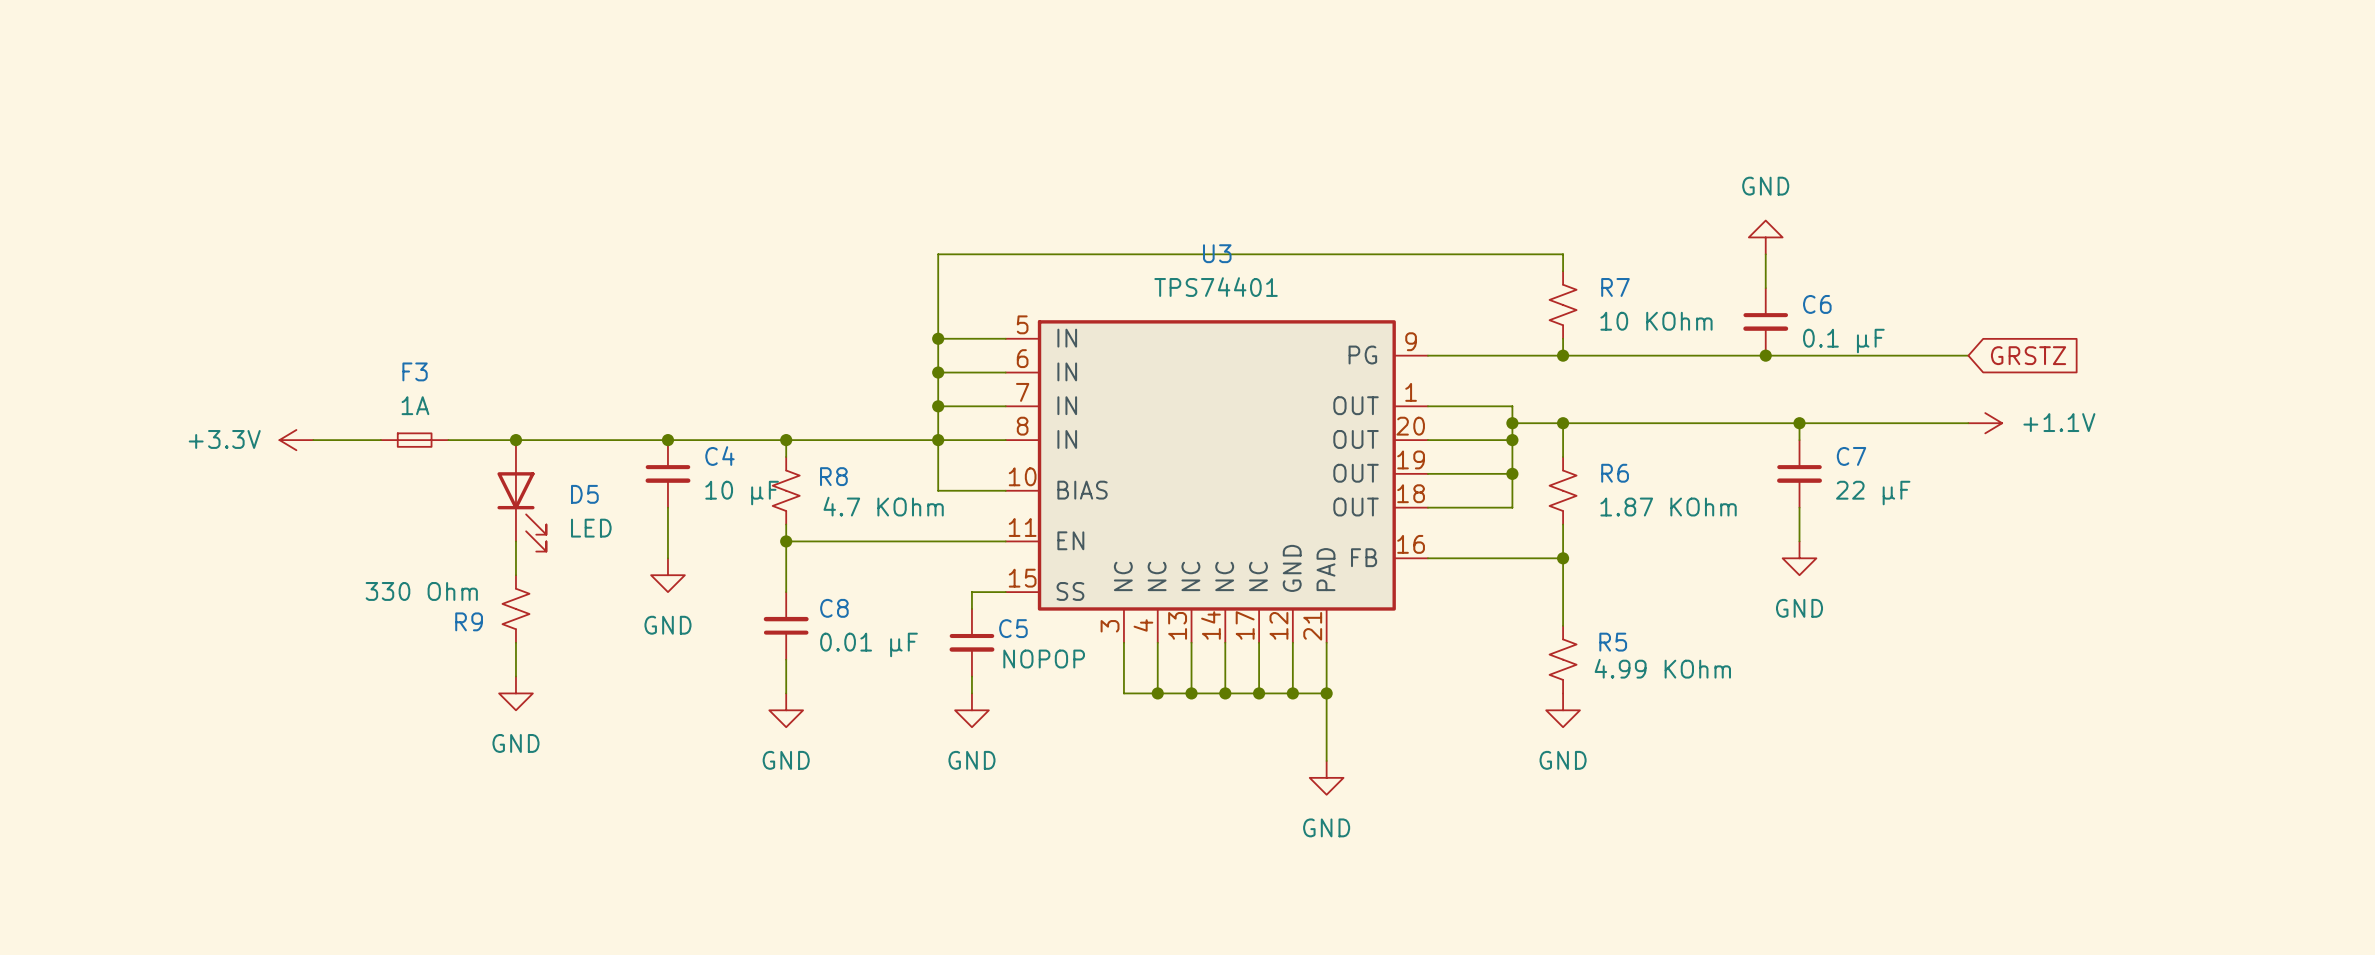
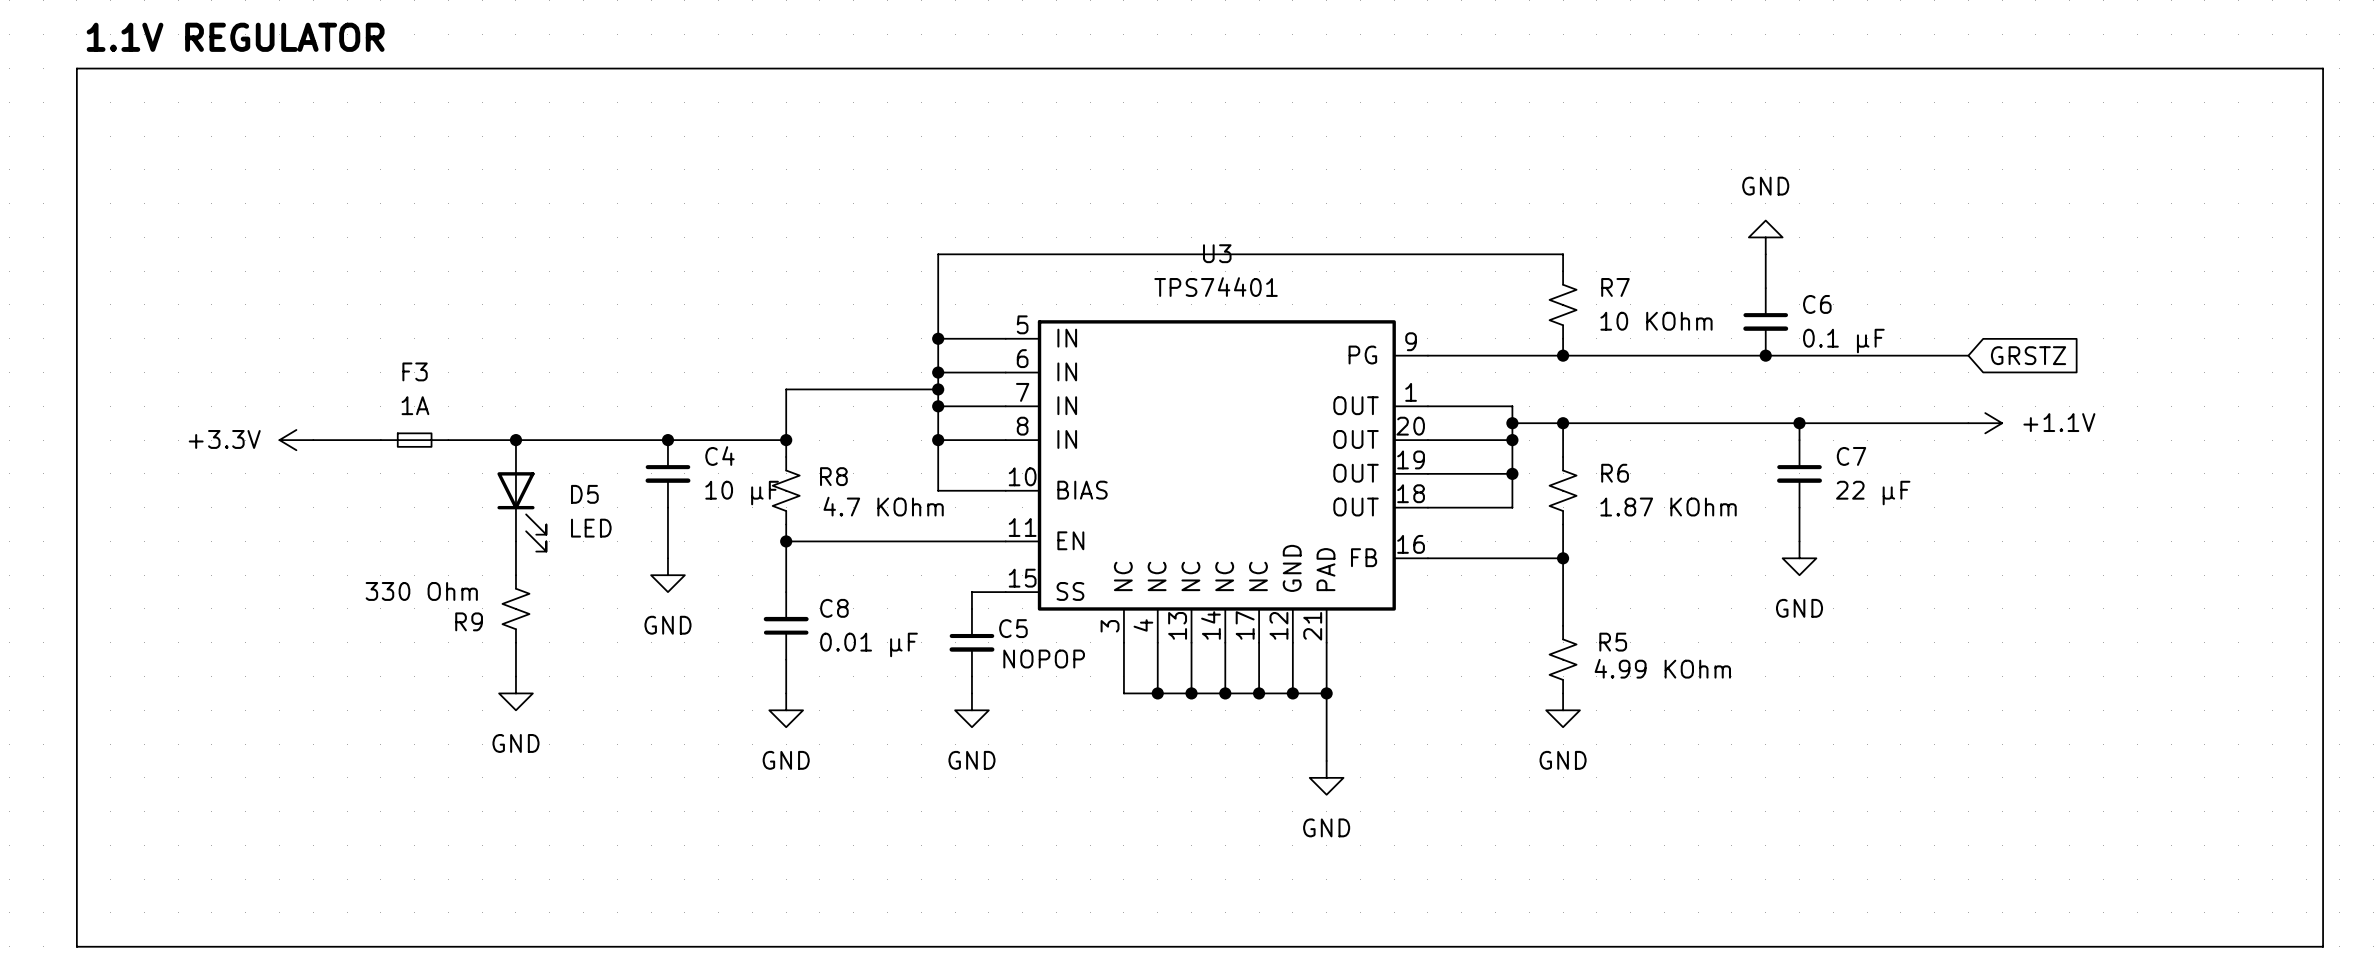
text: none -> 1.1V REGULATOR (235, 37)
line: none -> (76, 68) (2323, 68) (2323, 946) (76, 946) (76, 68)
junction: none -> (938, 389)
wire: (786, 440) (938, 440) -> (786, 440) (786, 389) (938, 389)

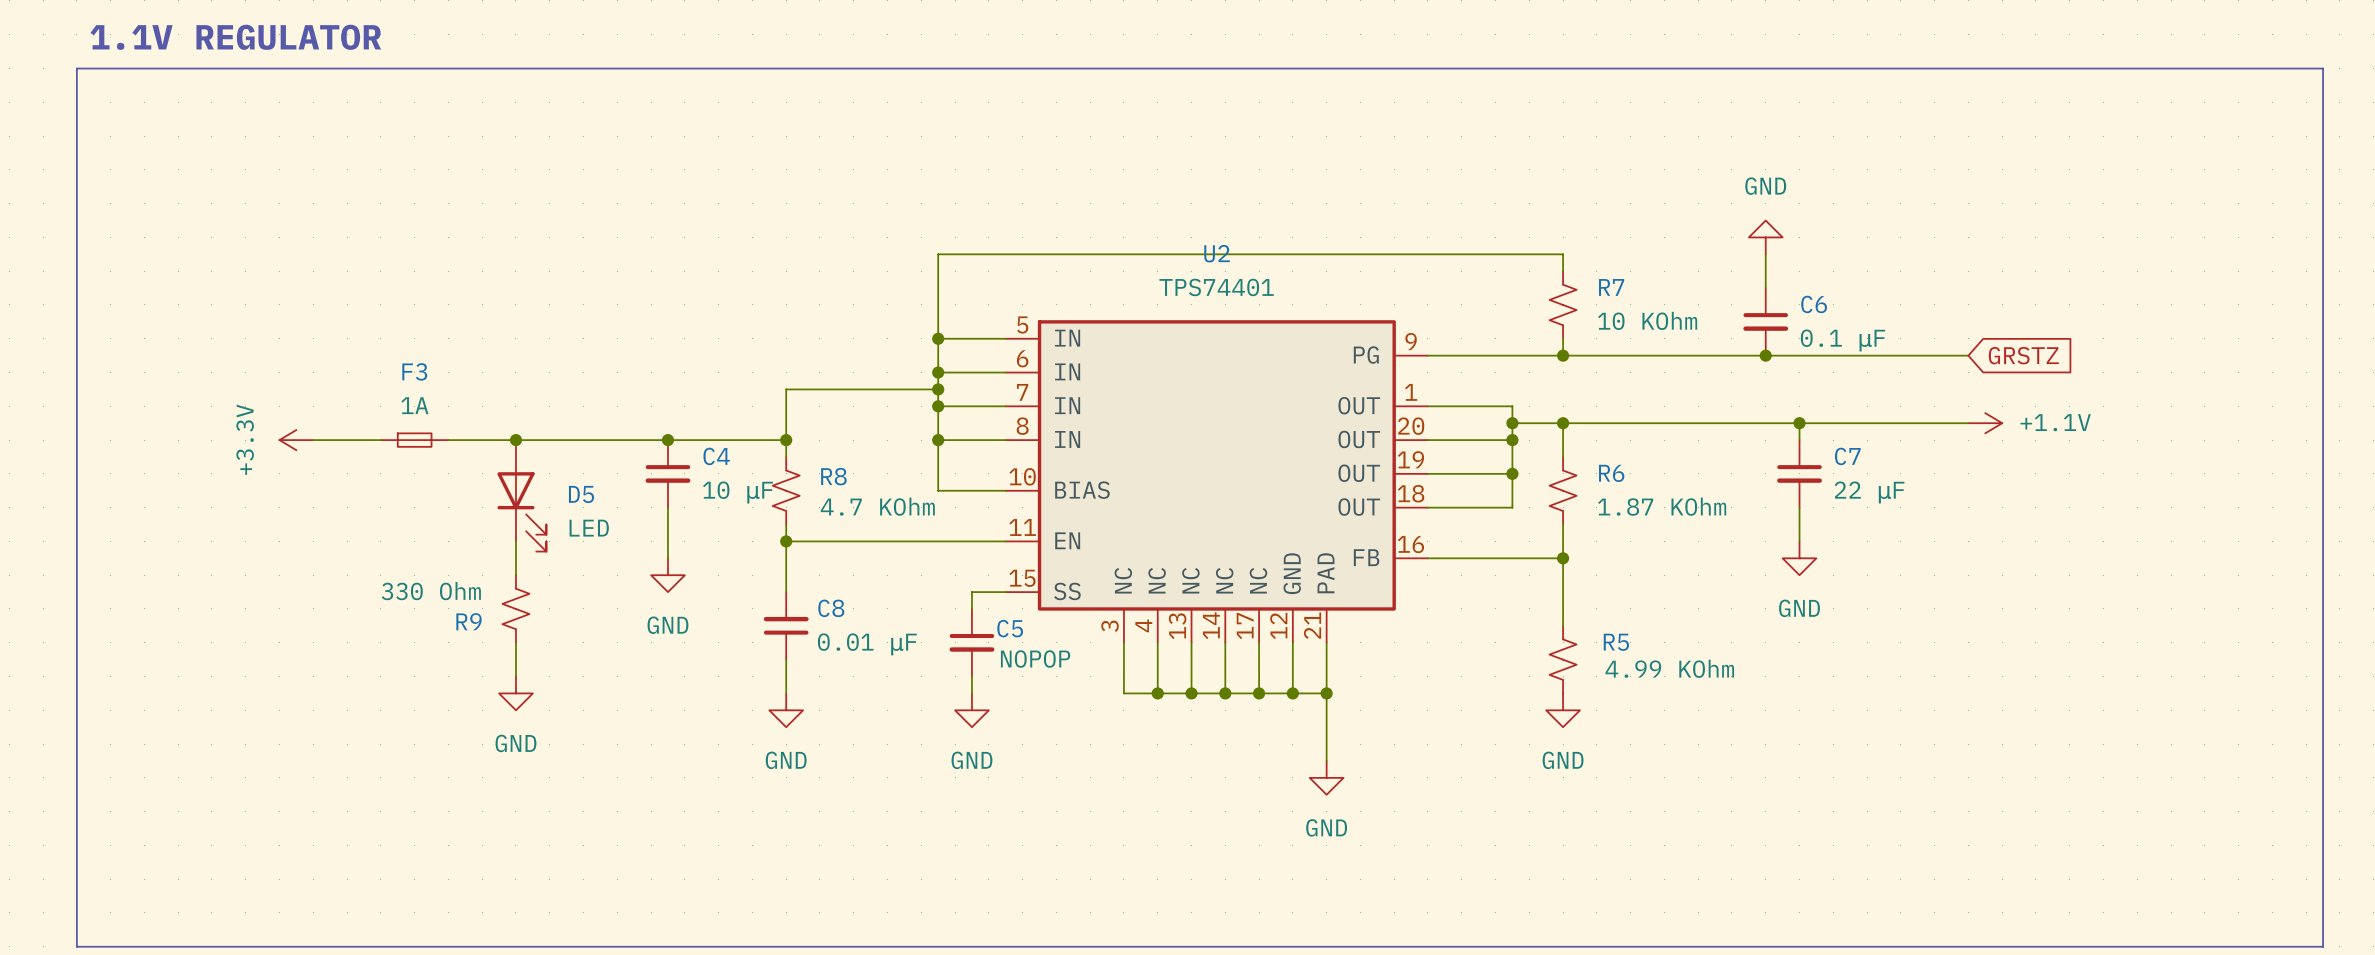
U3 name: U3 (1217, 253) -> U2 (1217, 253)
power symbol text rotation: 0° (224, 439) -> 90° counterclockwise (245, 439)

